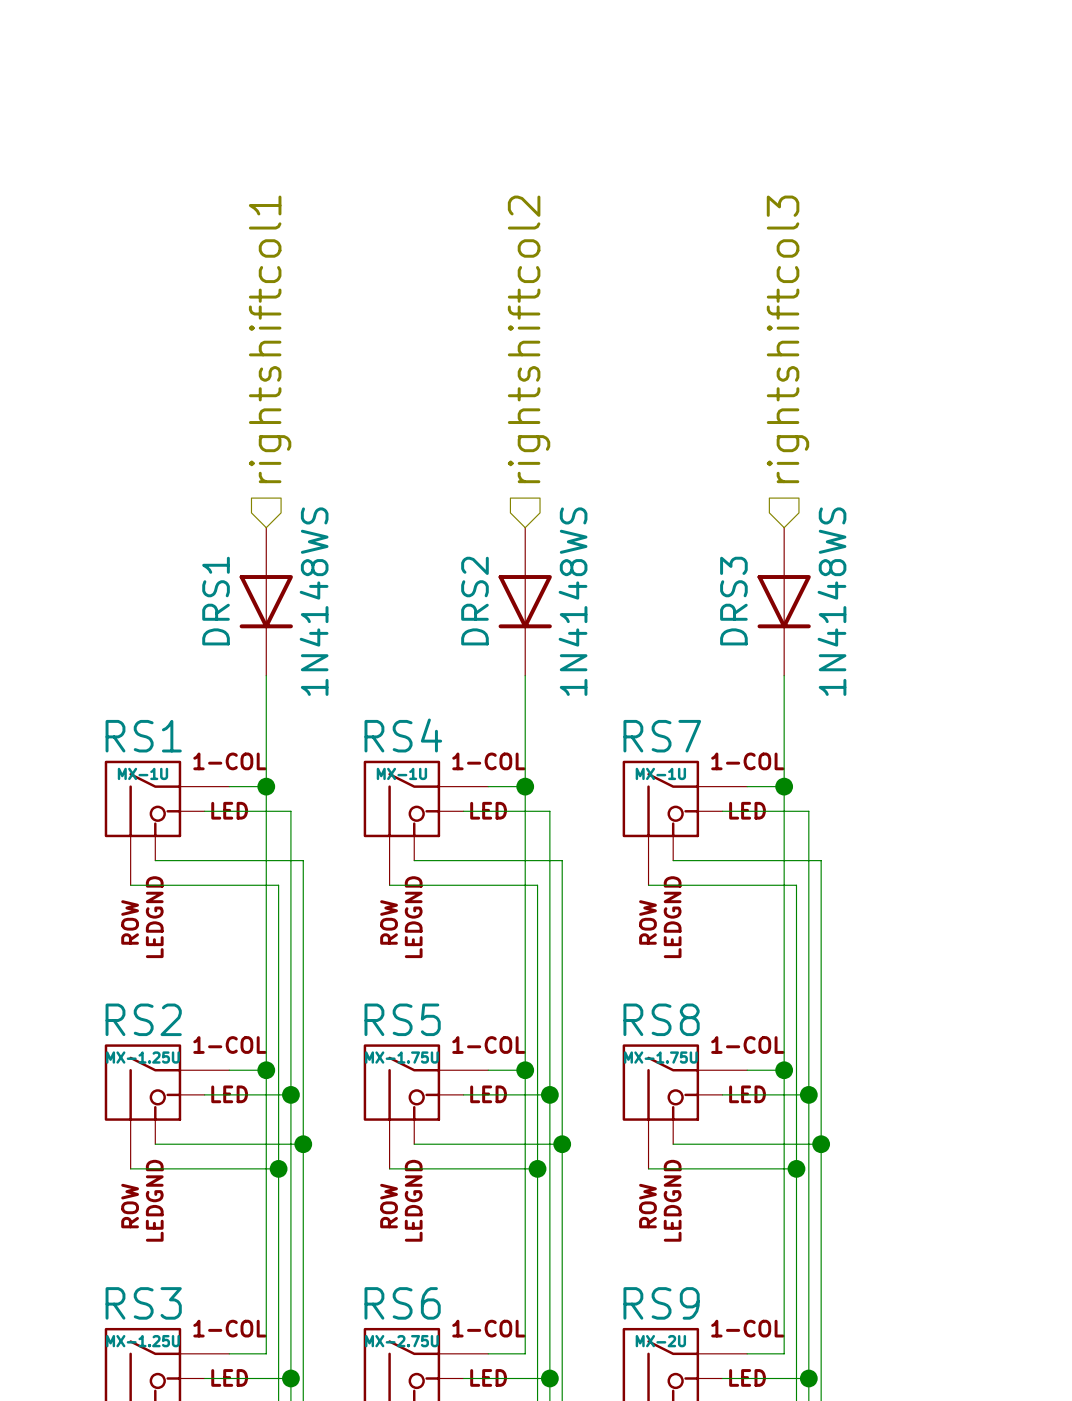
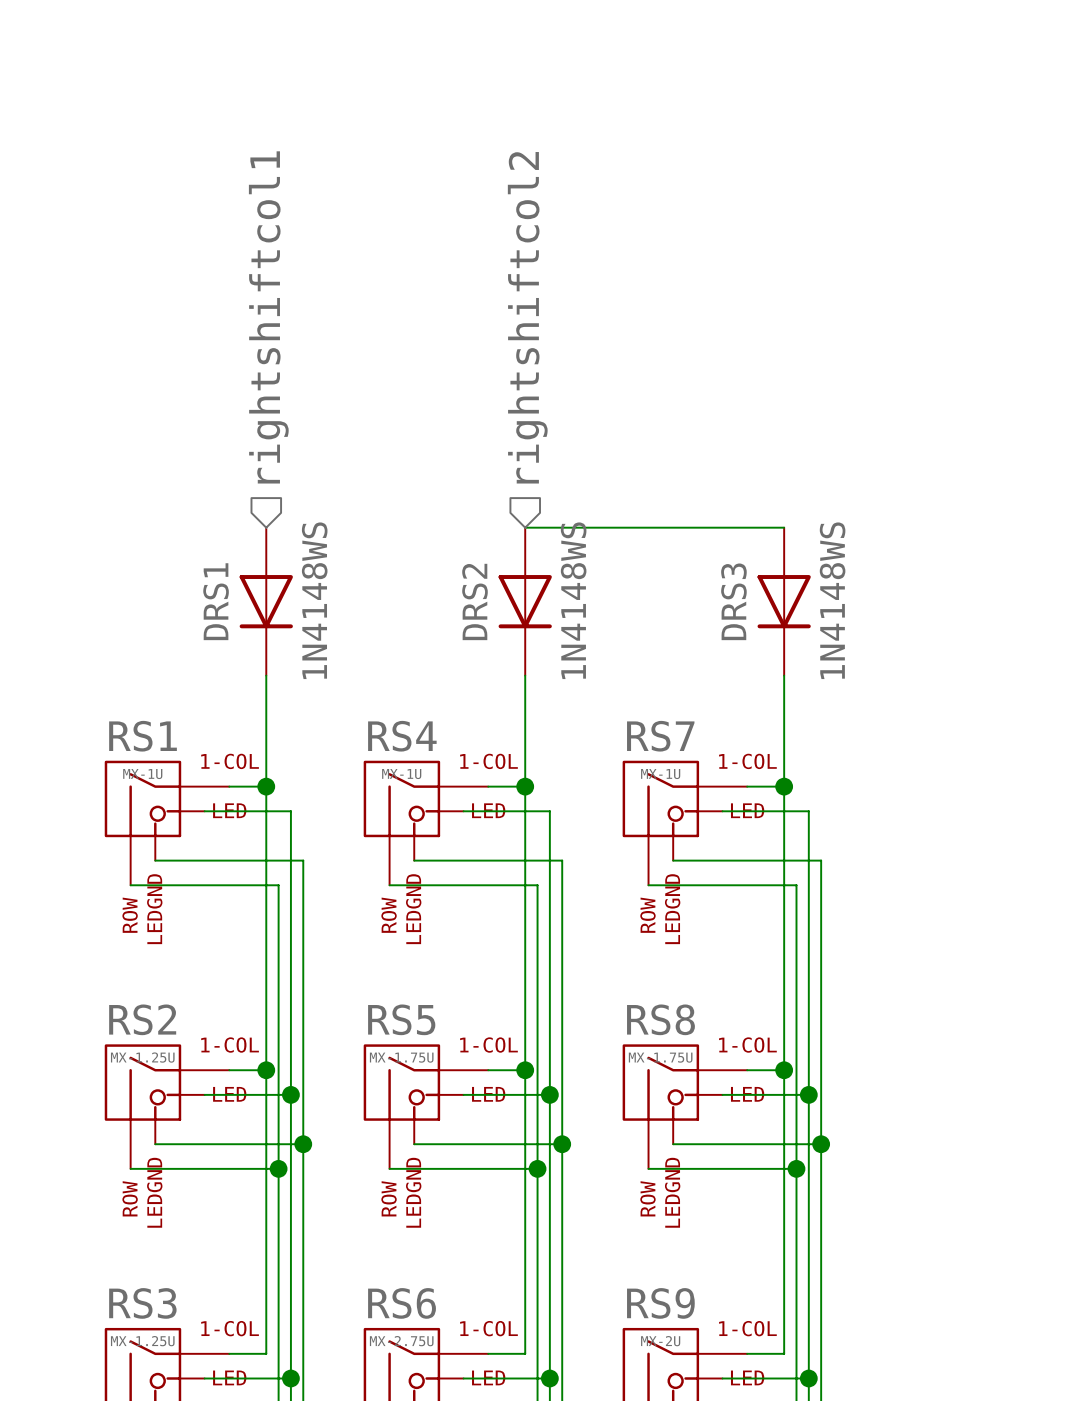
hierarchical label: rightshiftcol3 (787, 339) -> none
wire: none -> (525, 527) (784, 527)

